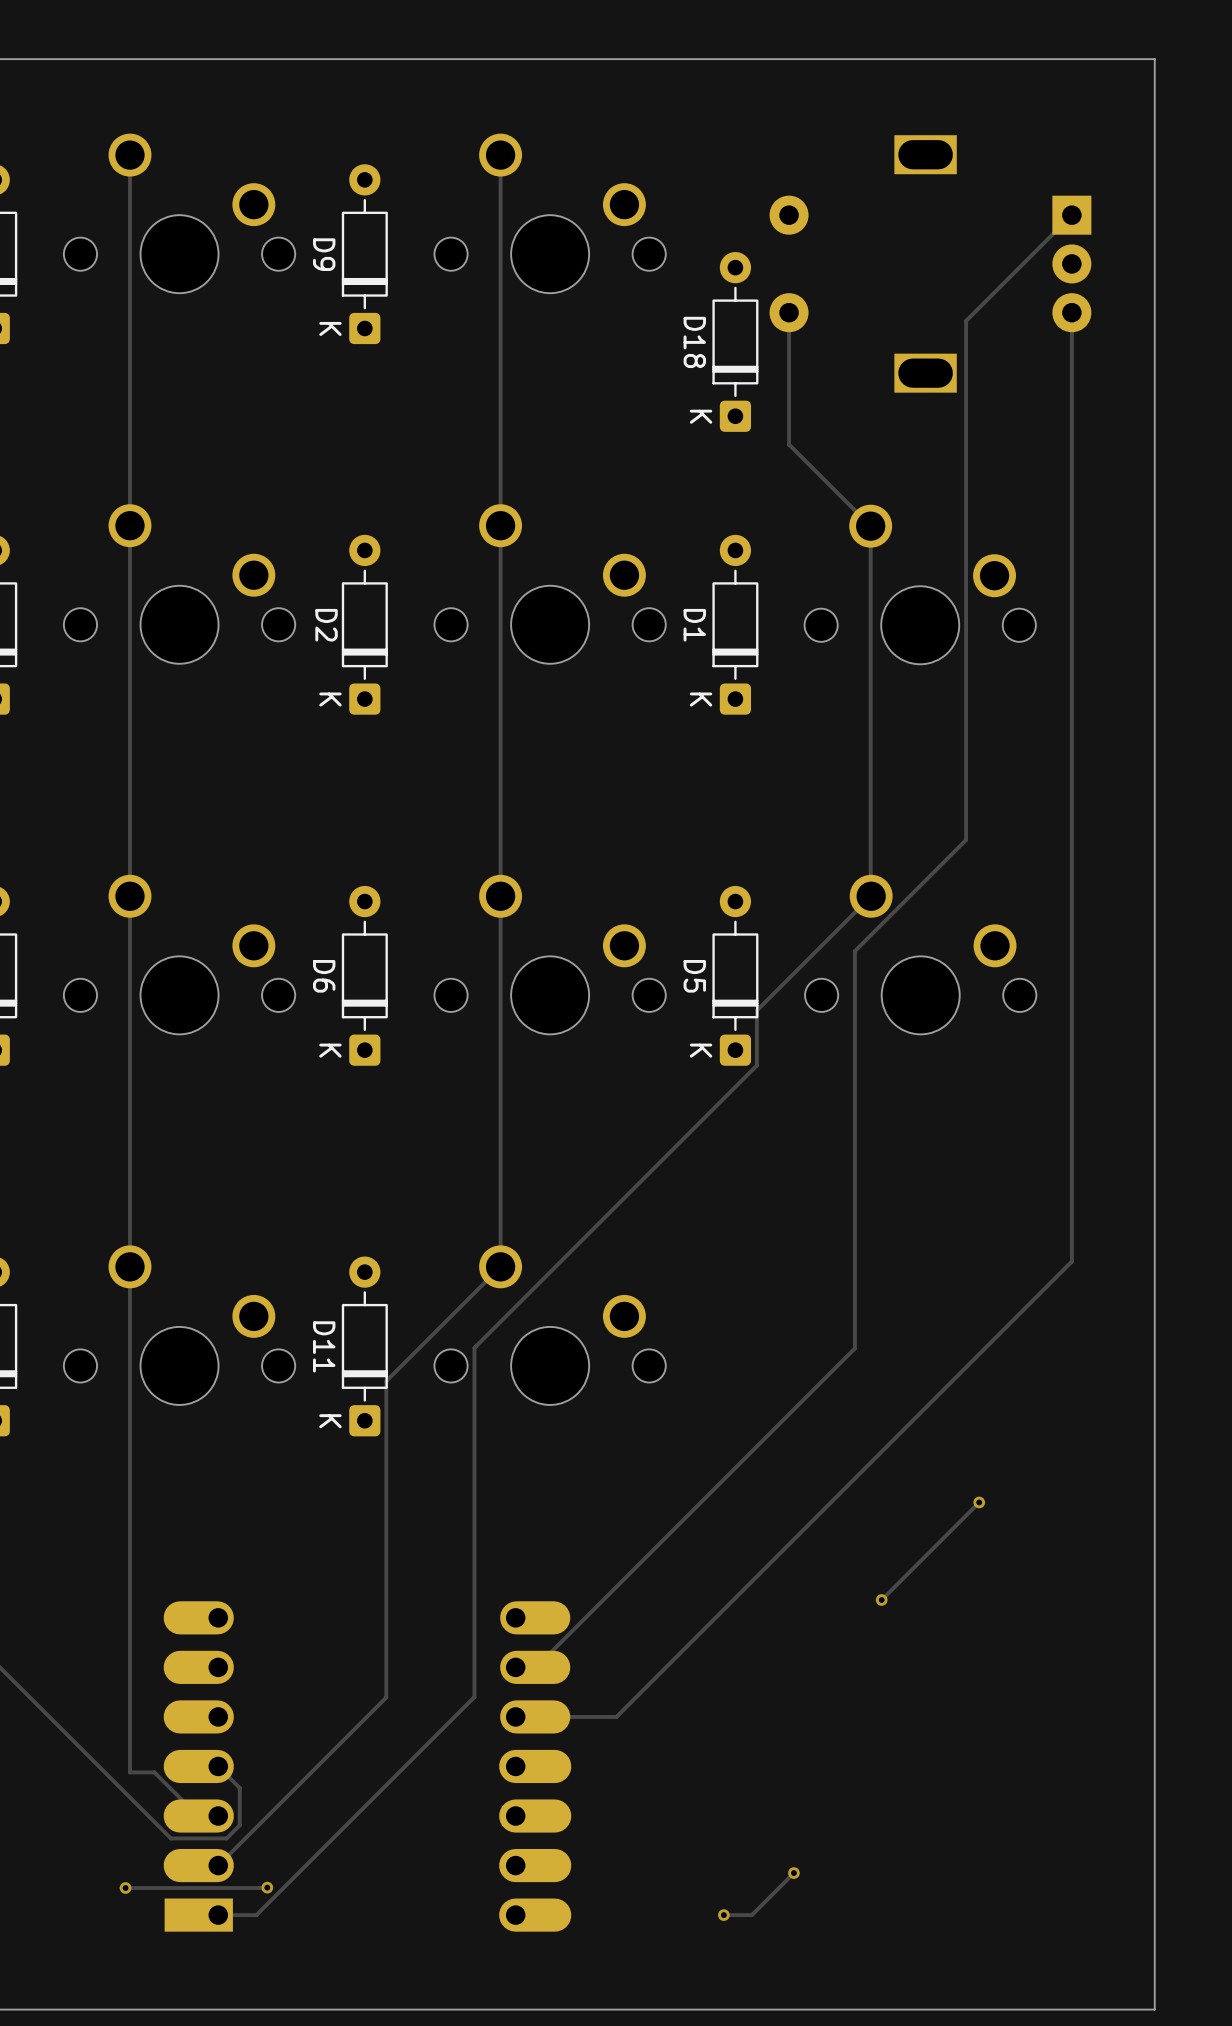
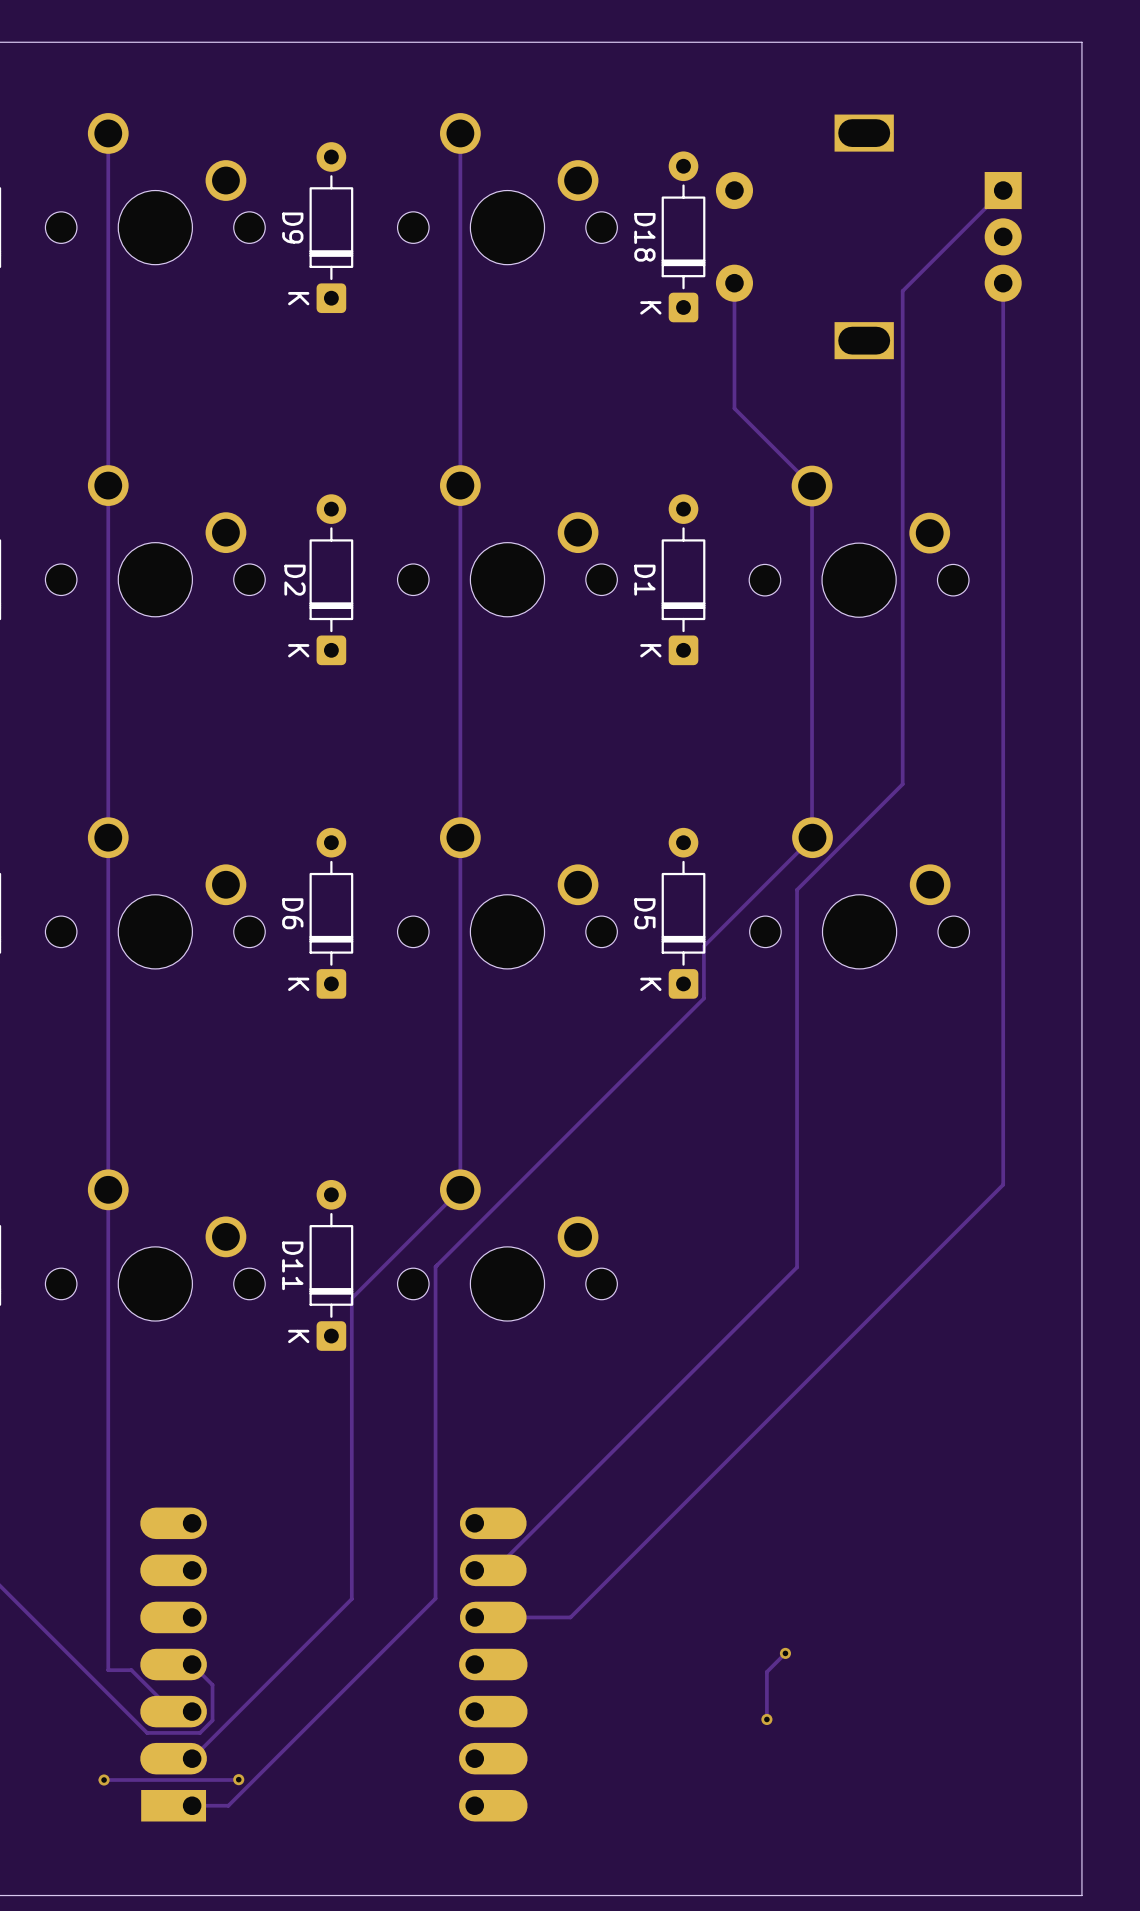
D18 position: (735, 341) -> (683, 236)
track: (979, 1502) (881, 1599) -> none
via: (979, 1502) -> none
via: (881, 1599) -> none
track: none -> (785, 1653) (766, 1671) (766, 1719)
via: none -> (785, 1653)
track: (793, 1873) (751, 1915) (723, 1915) -> none
via position: (793, 1873) -> (766, 1719)
via: (723, 1915) -> none

